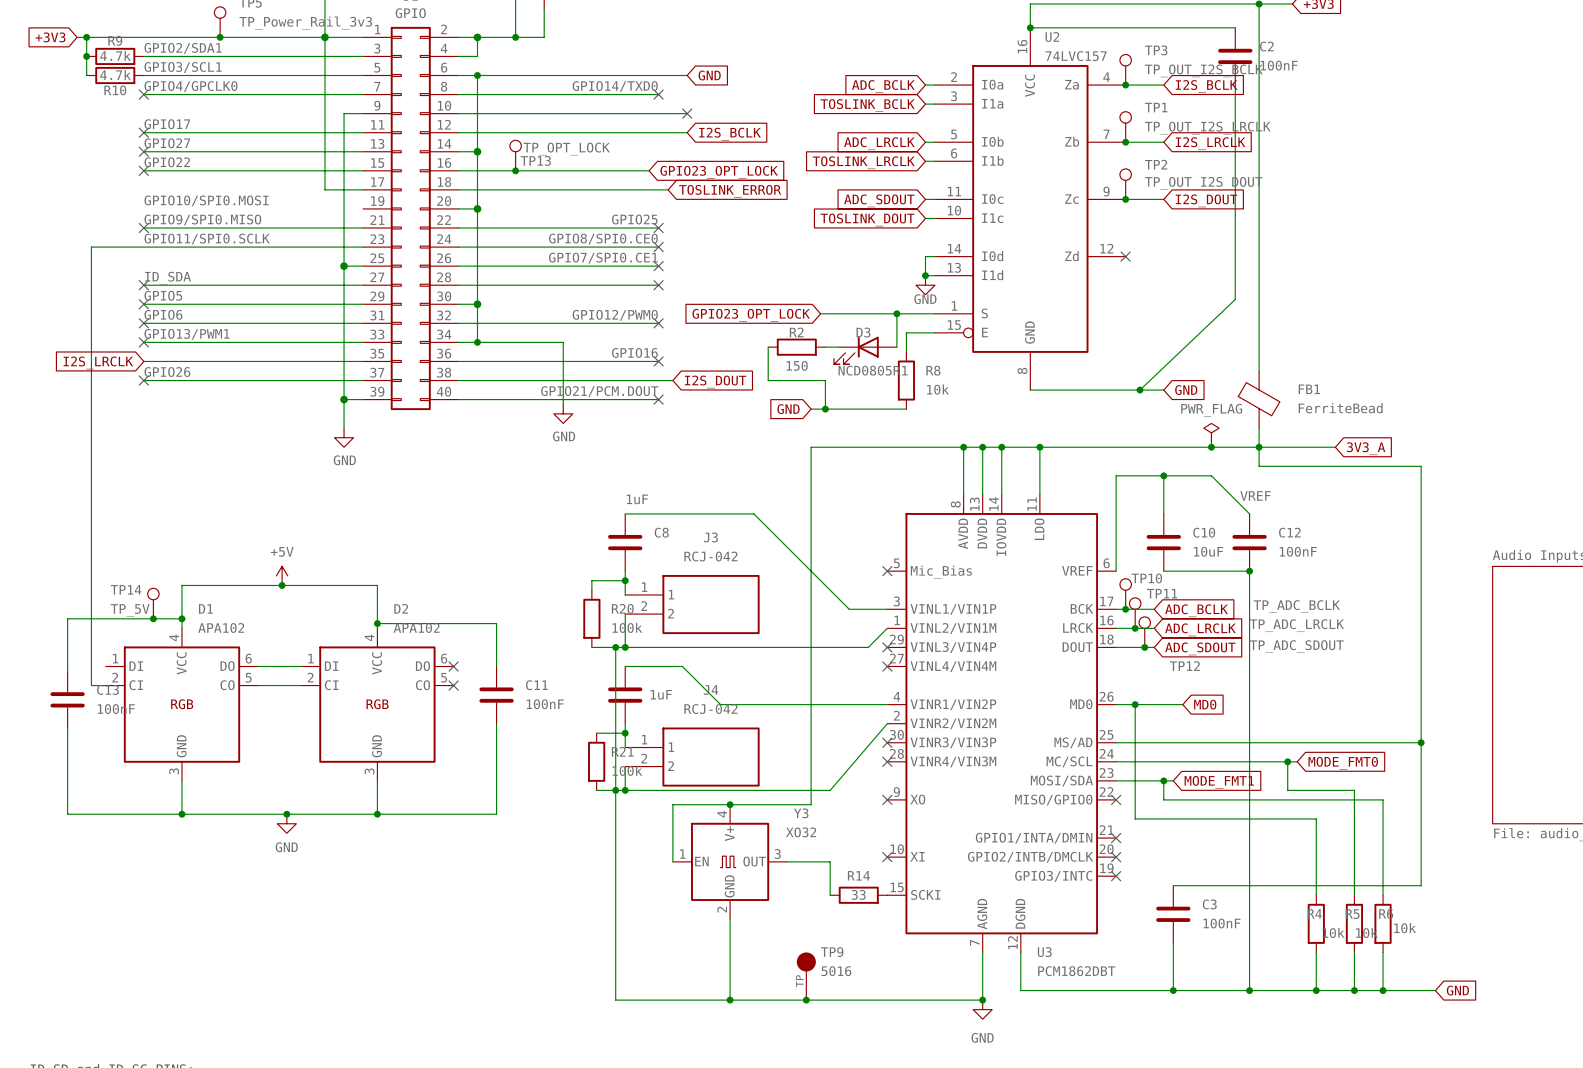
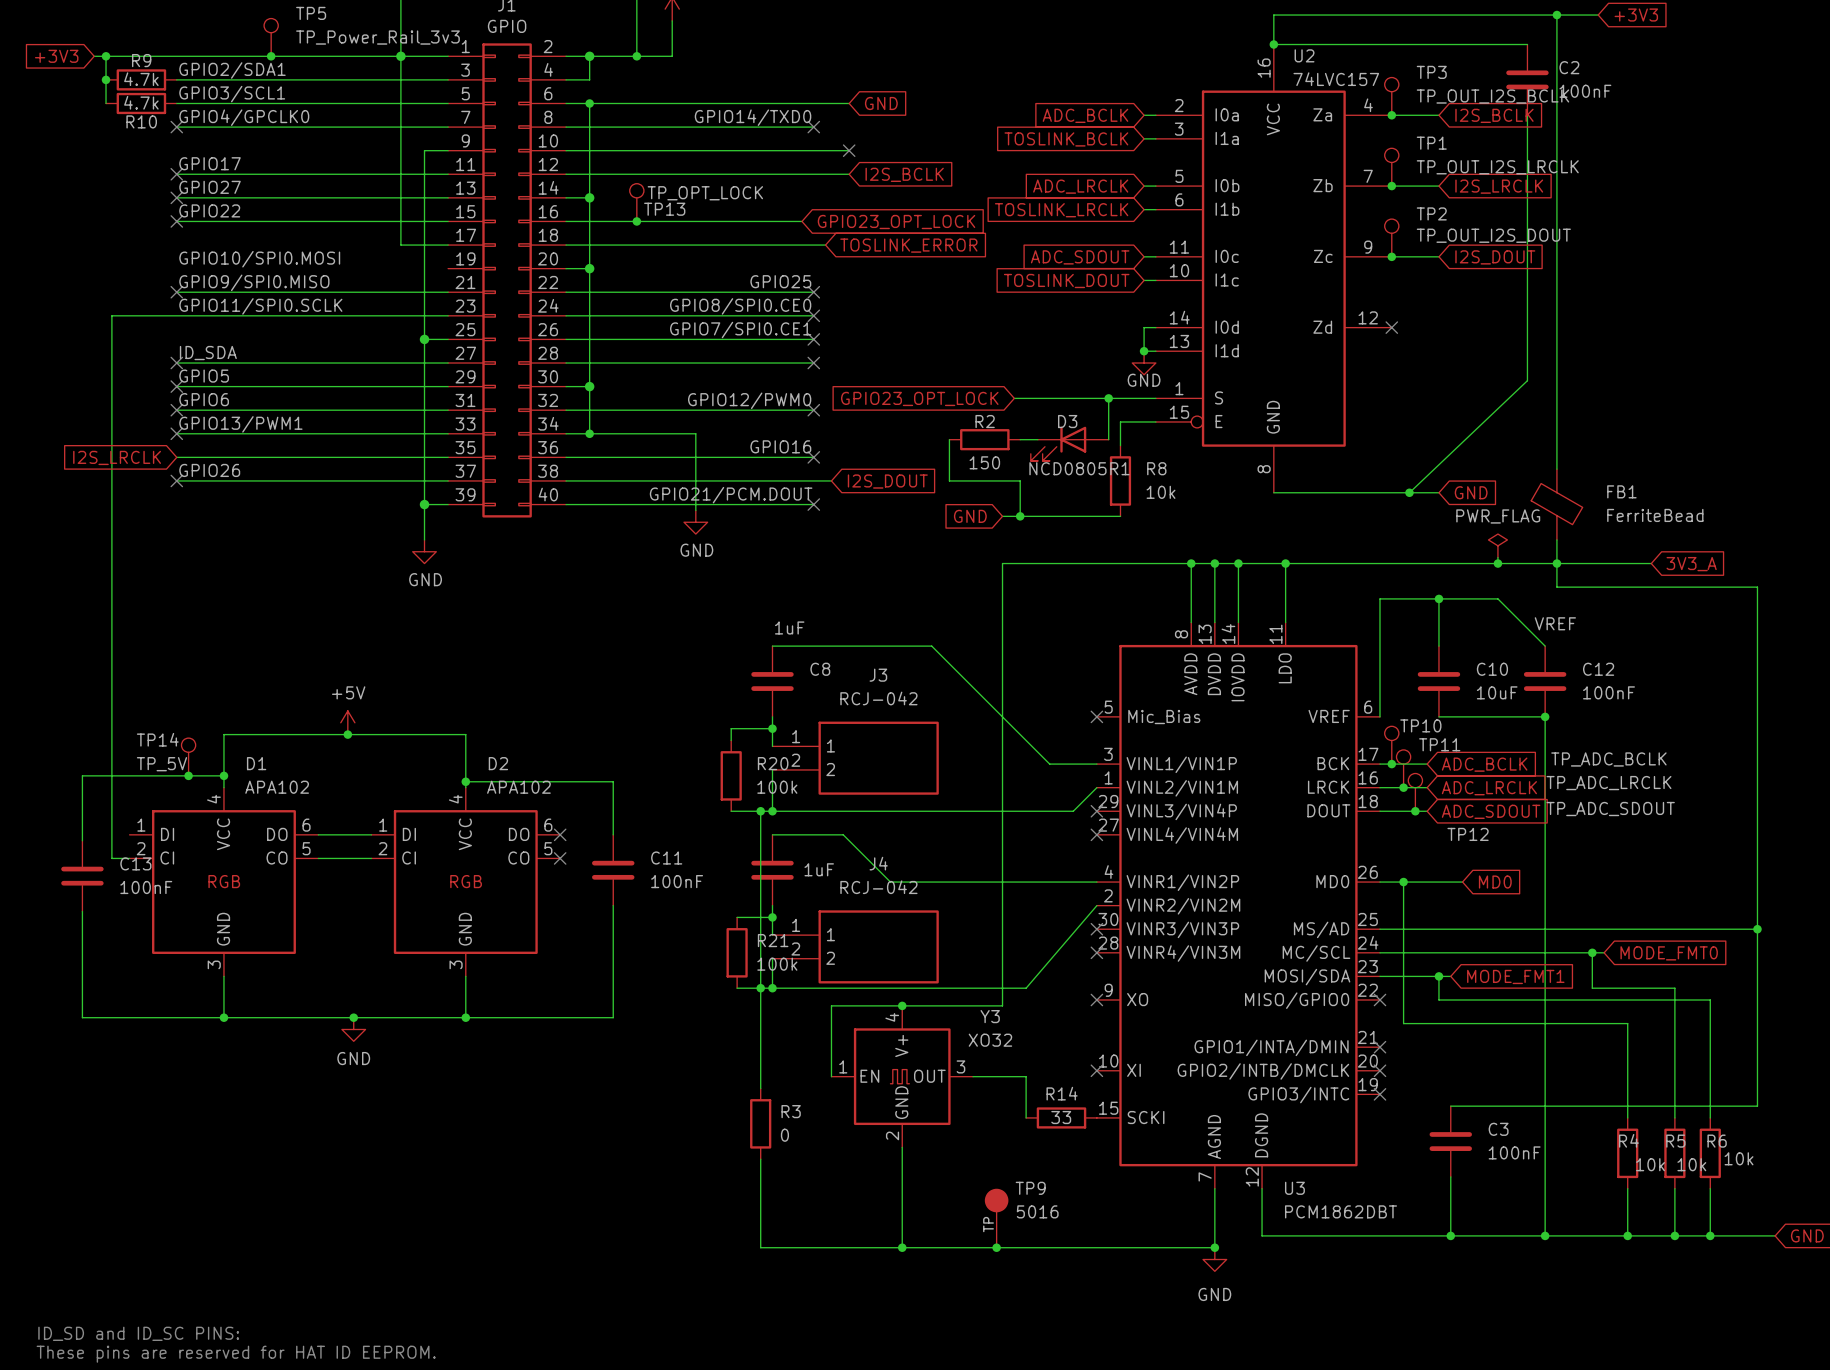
wire: (615, 871) (615, 928) -> none
R3: none -> 0 (760, 1123)

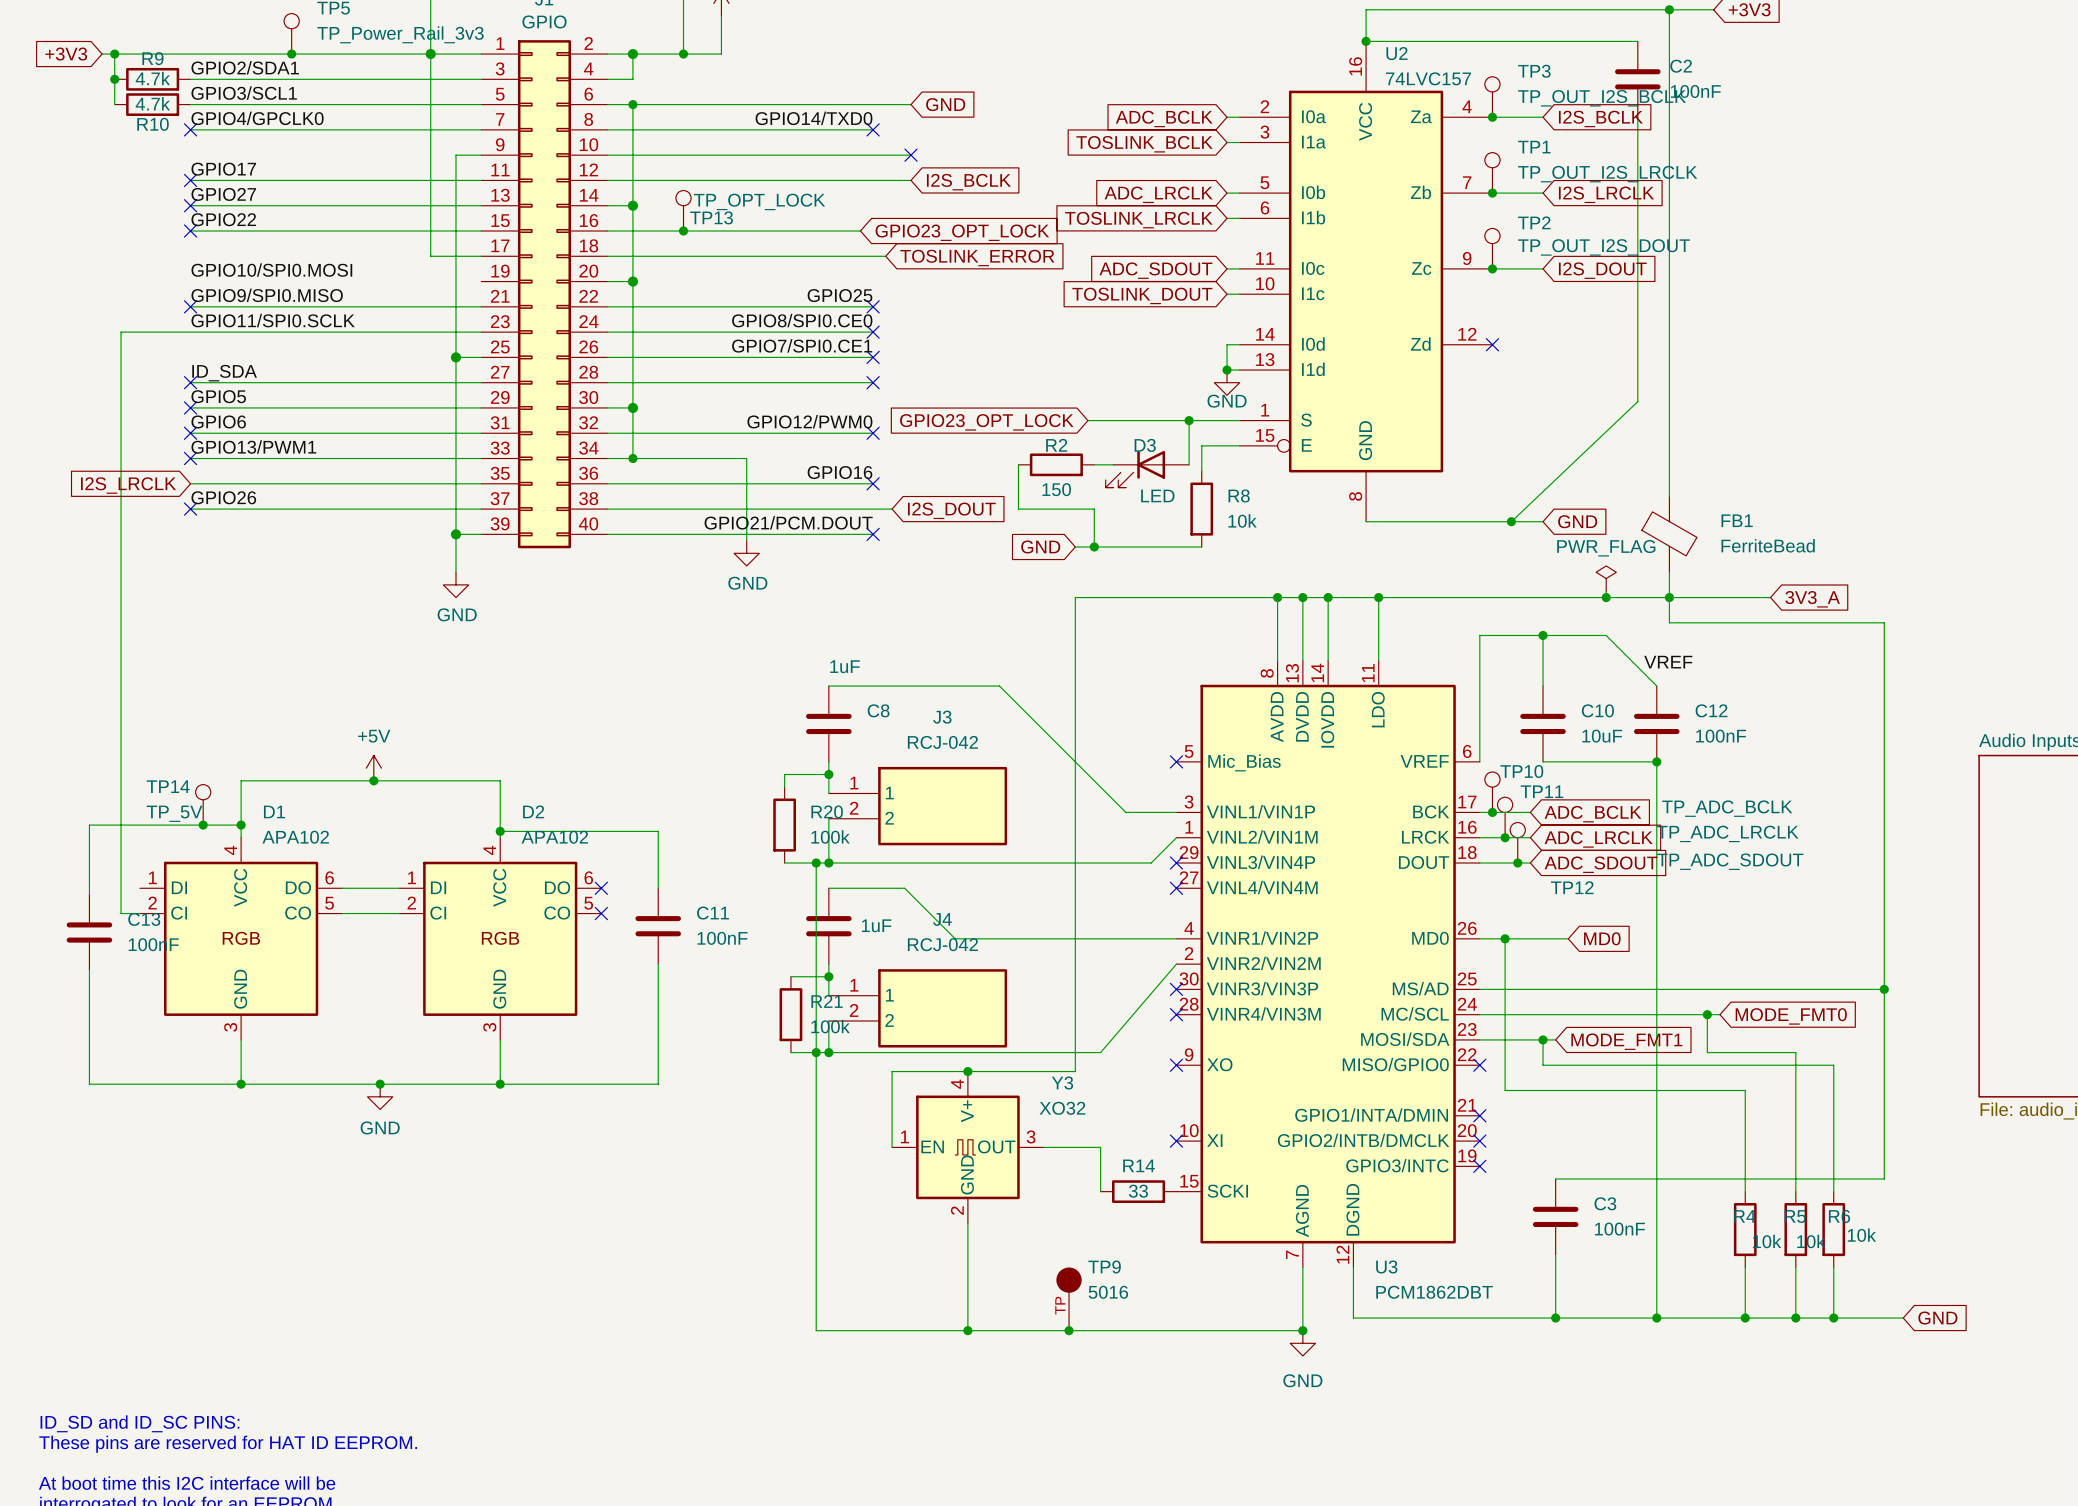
D3 value: NCD0805R1 (1079, 468) -> LED (1157, 495)
wire: none -> (816, 1160) (816, 1235)
R3: 0 (760, 1123) -> none

